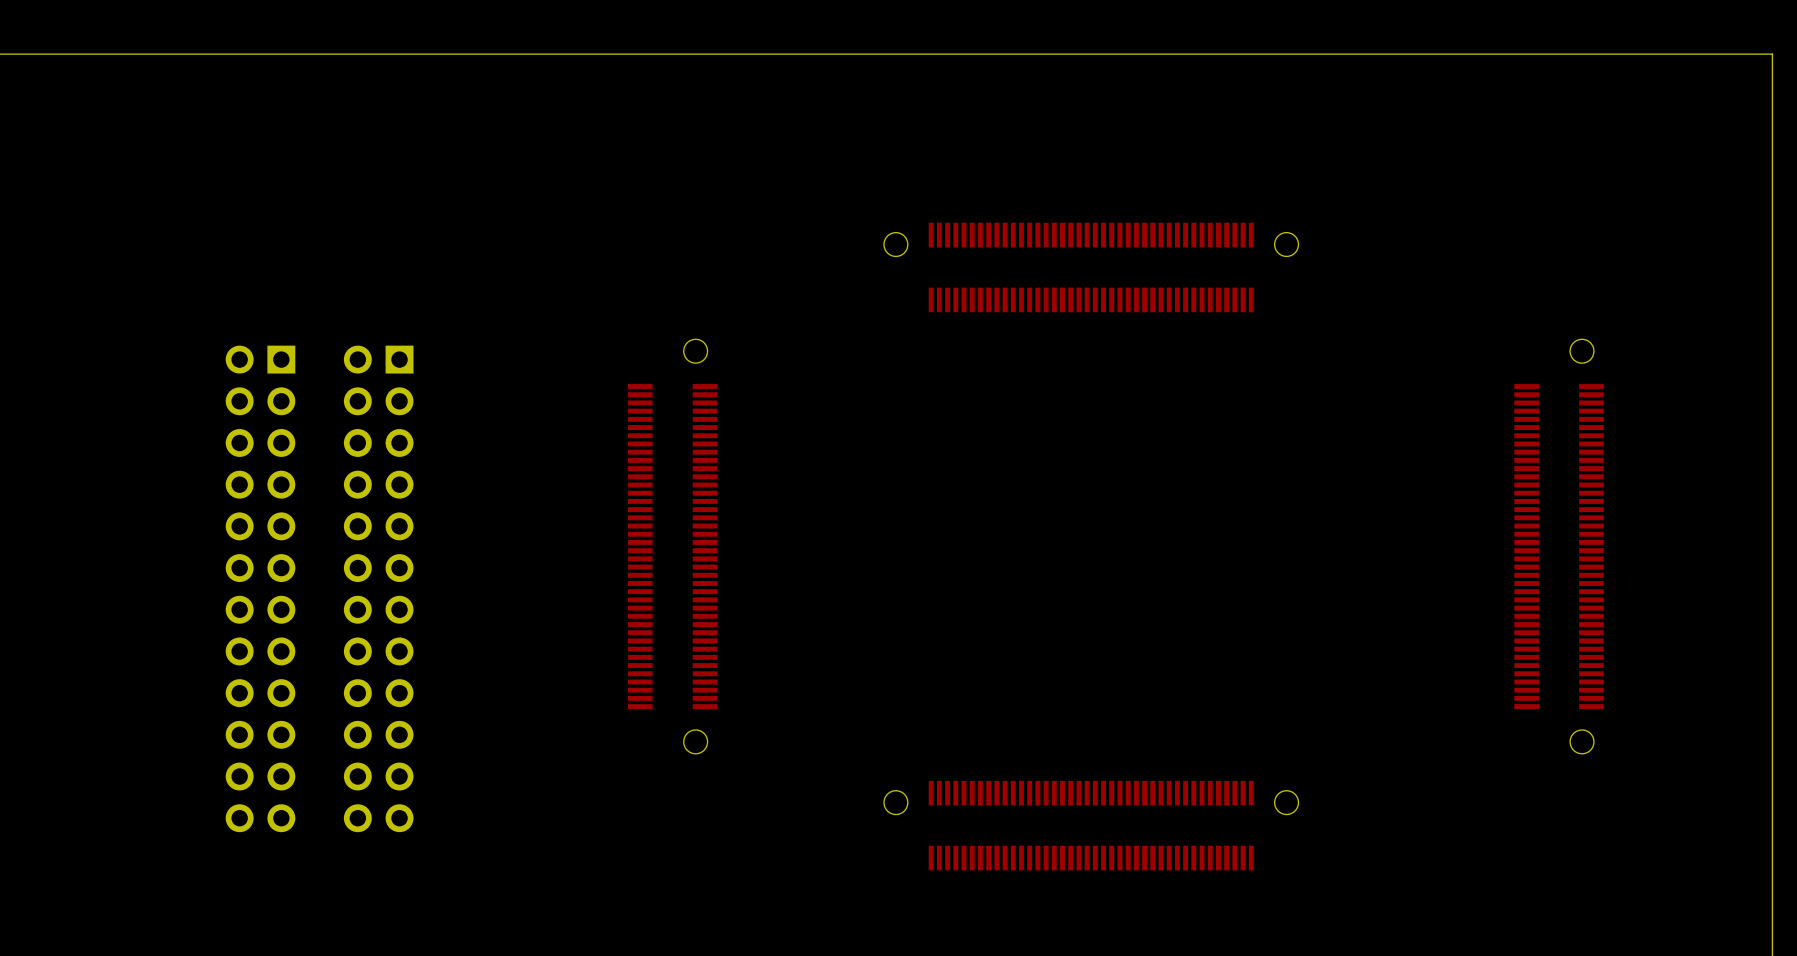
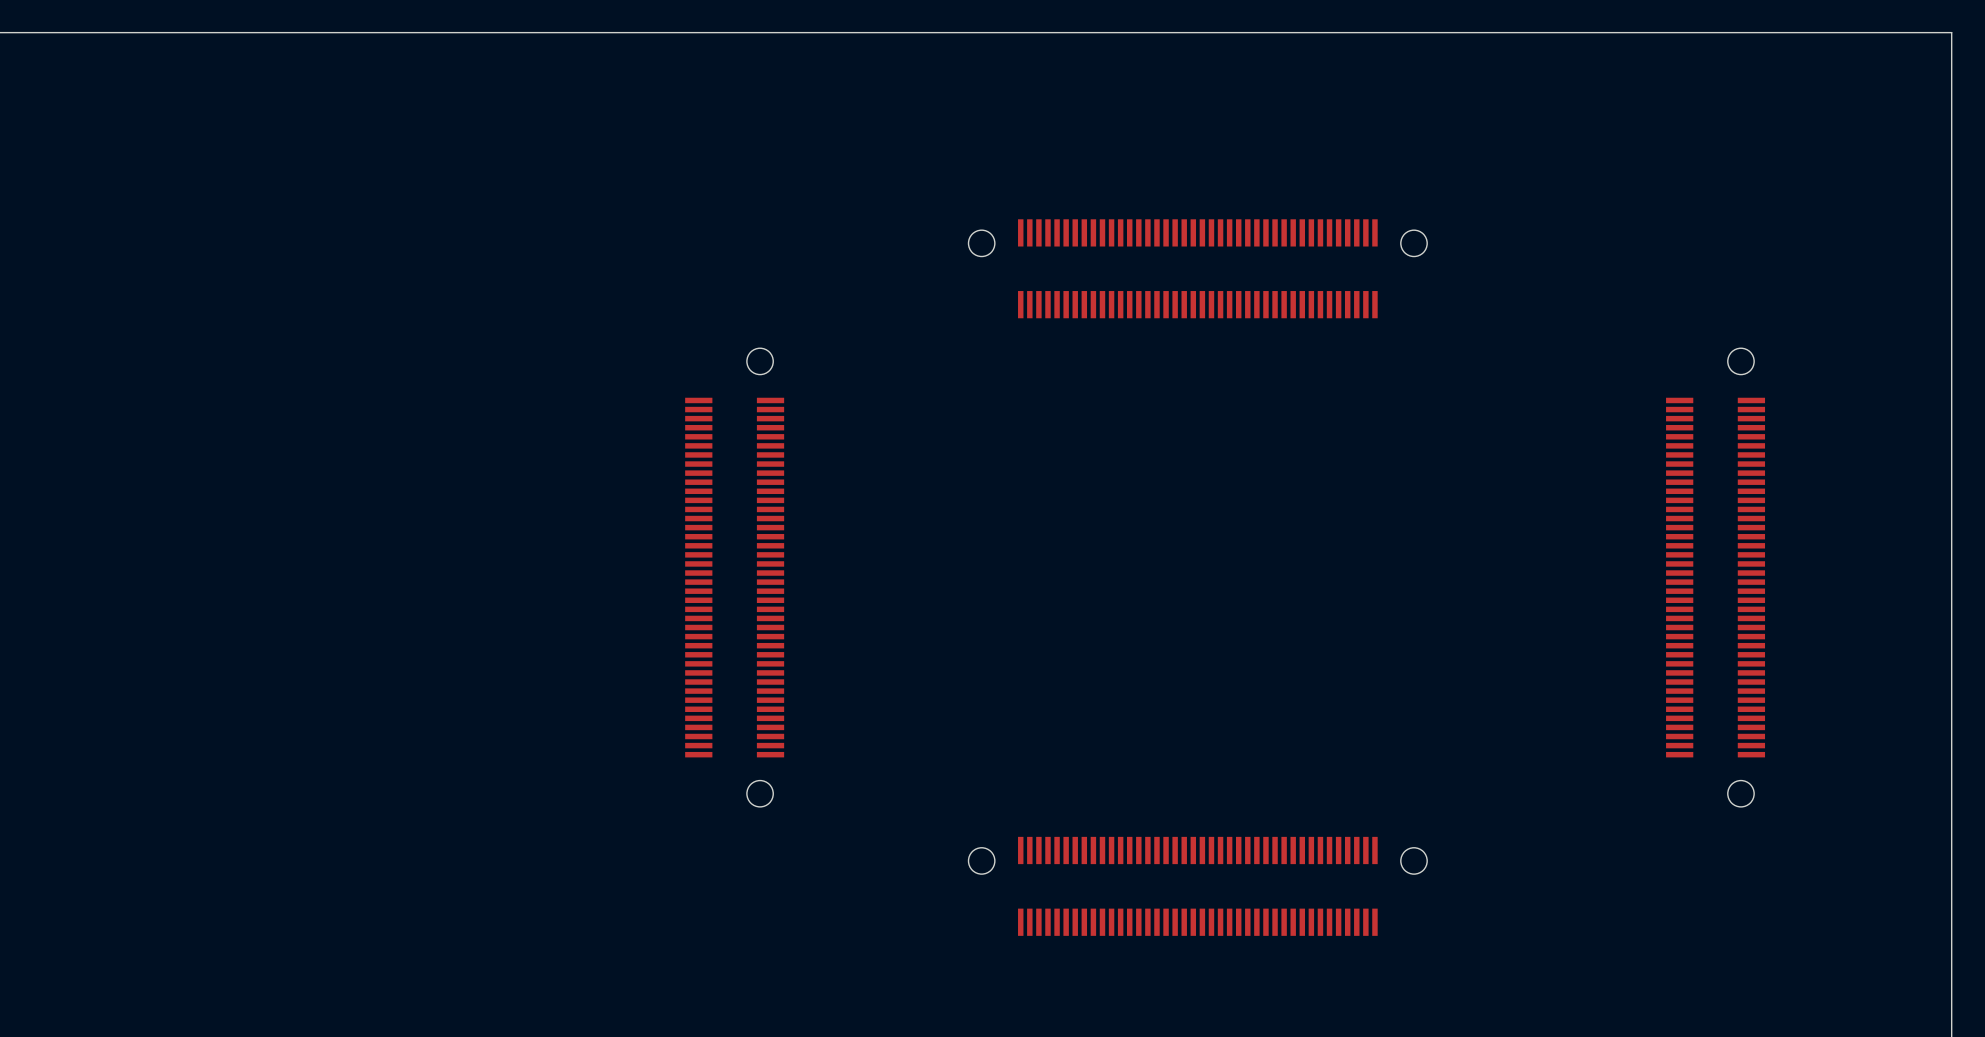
part: (260, 588) -> none
part: (378, 588) -> none

